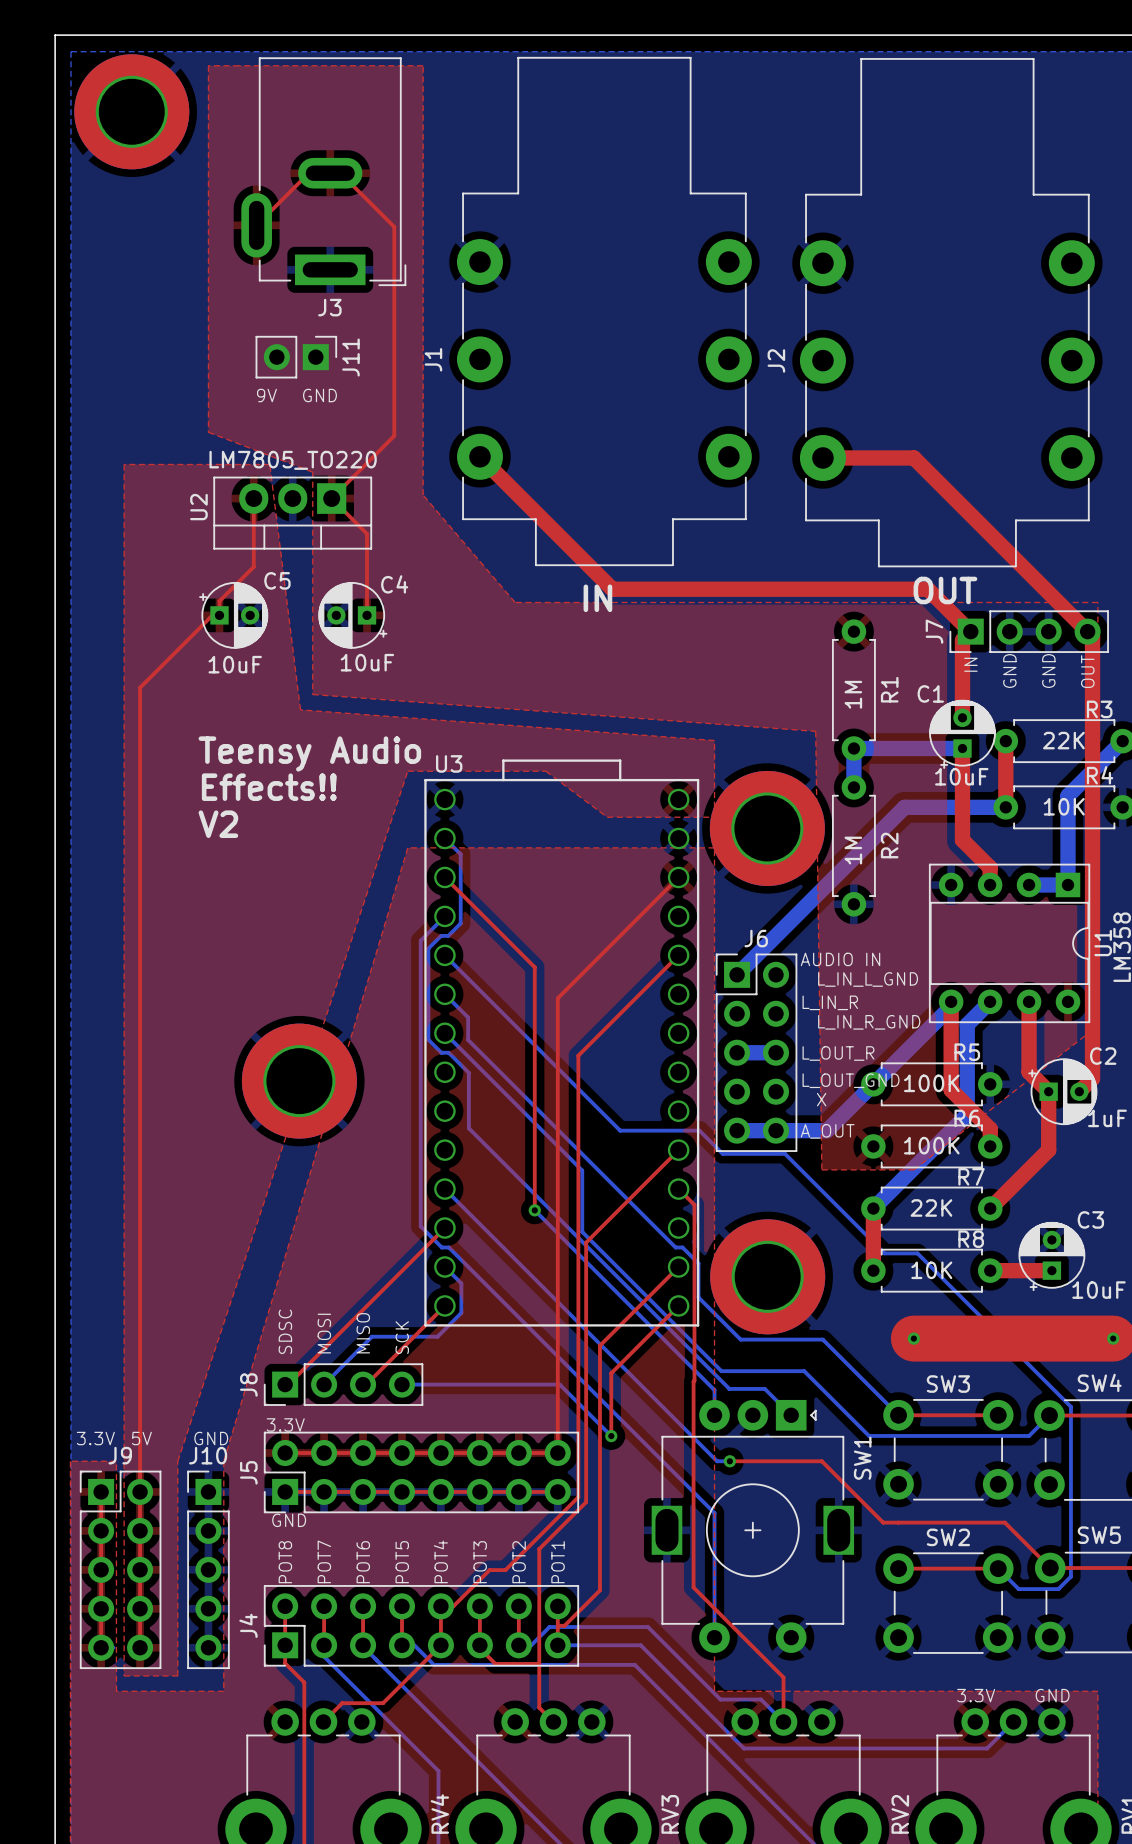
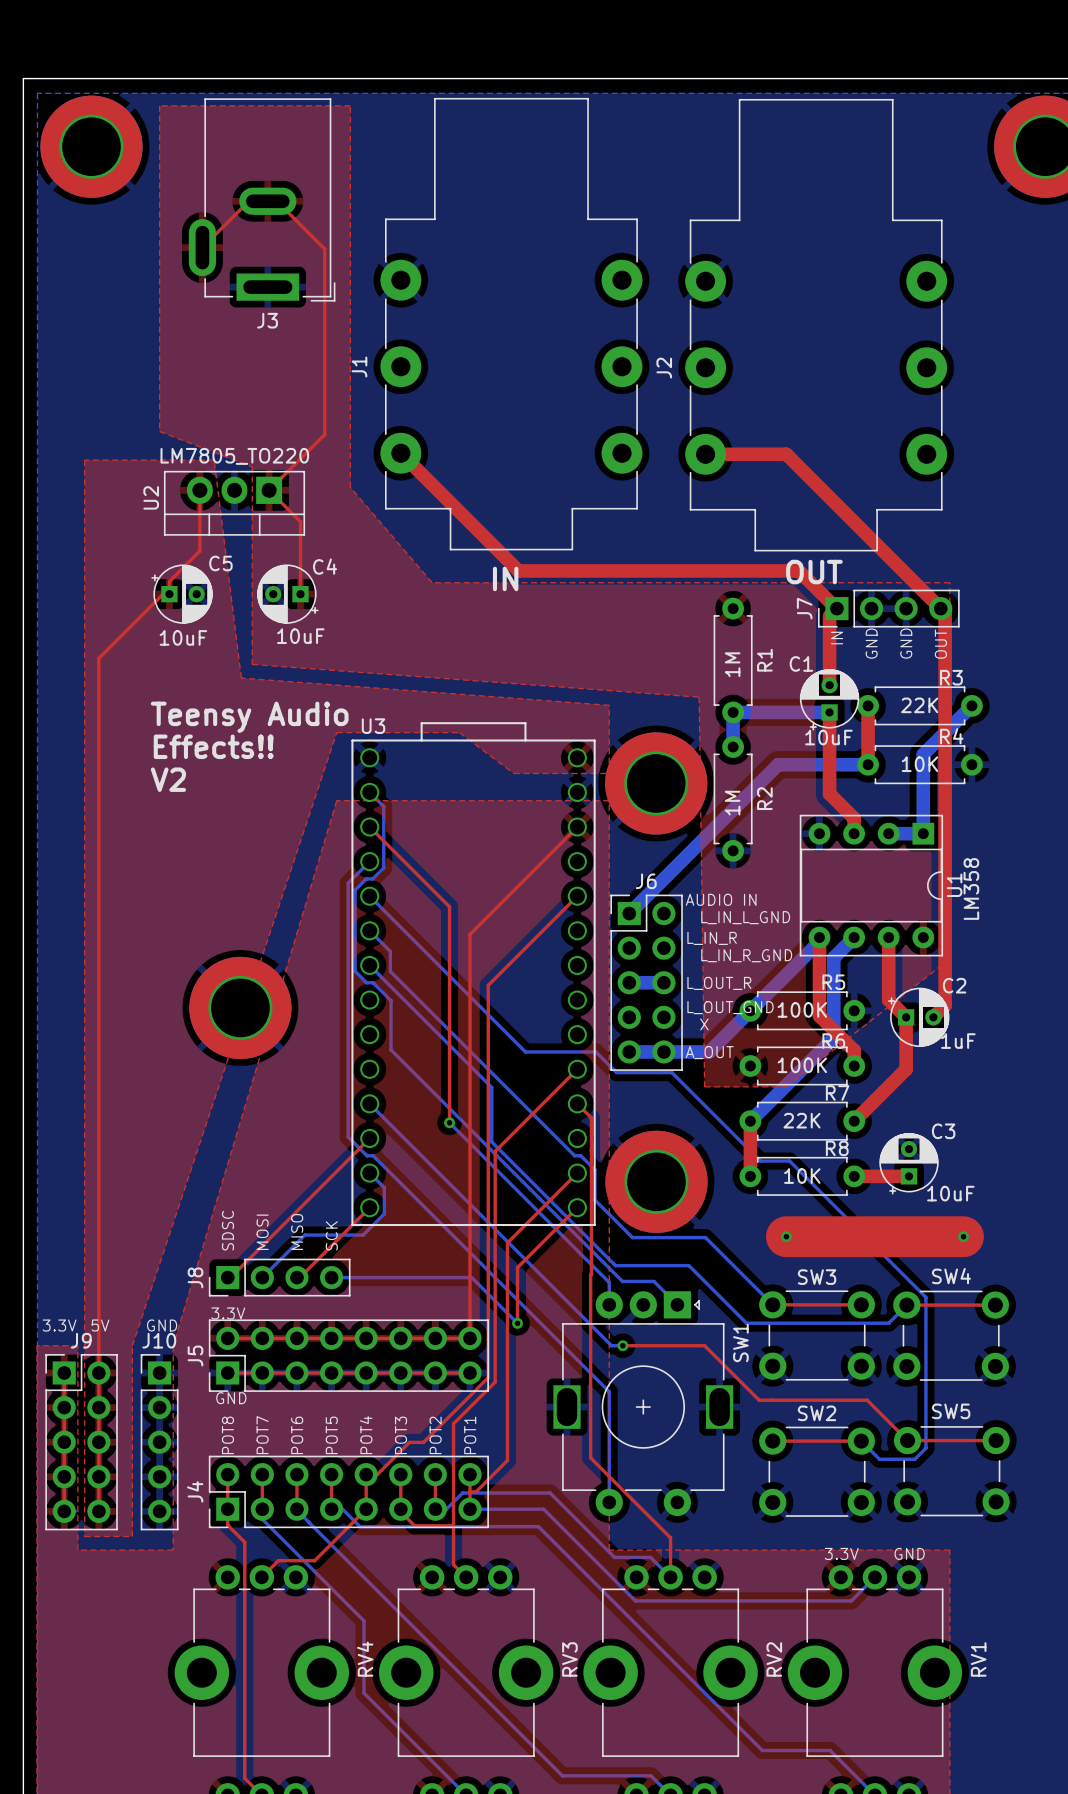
J11: (296, 357) -> none
text: 9V (266, 395) -> none
text: GND (319, 395) -> none

